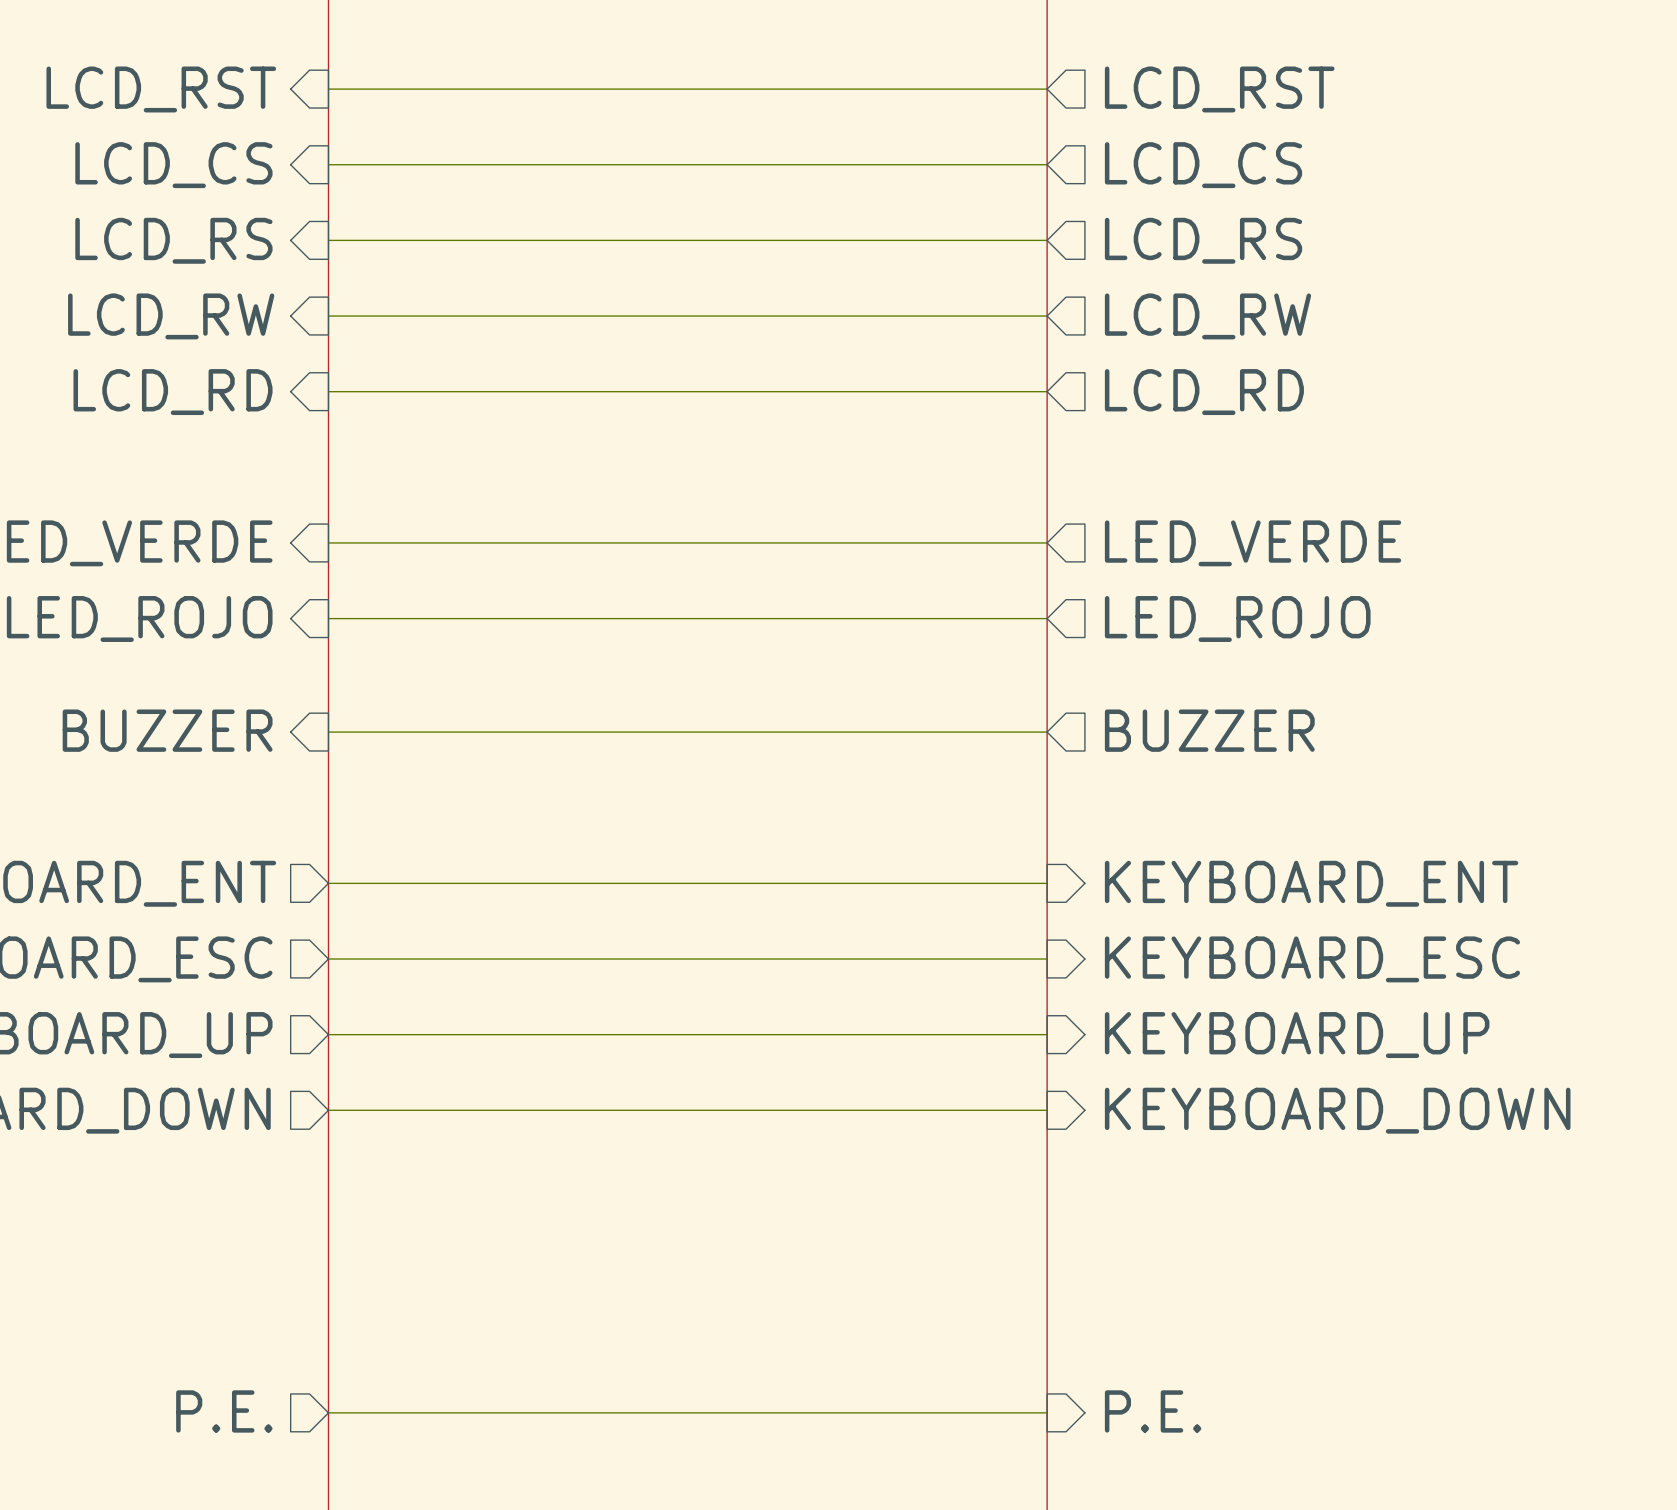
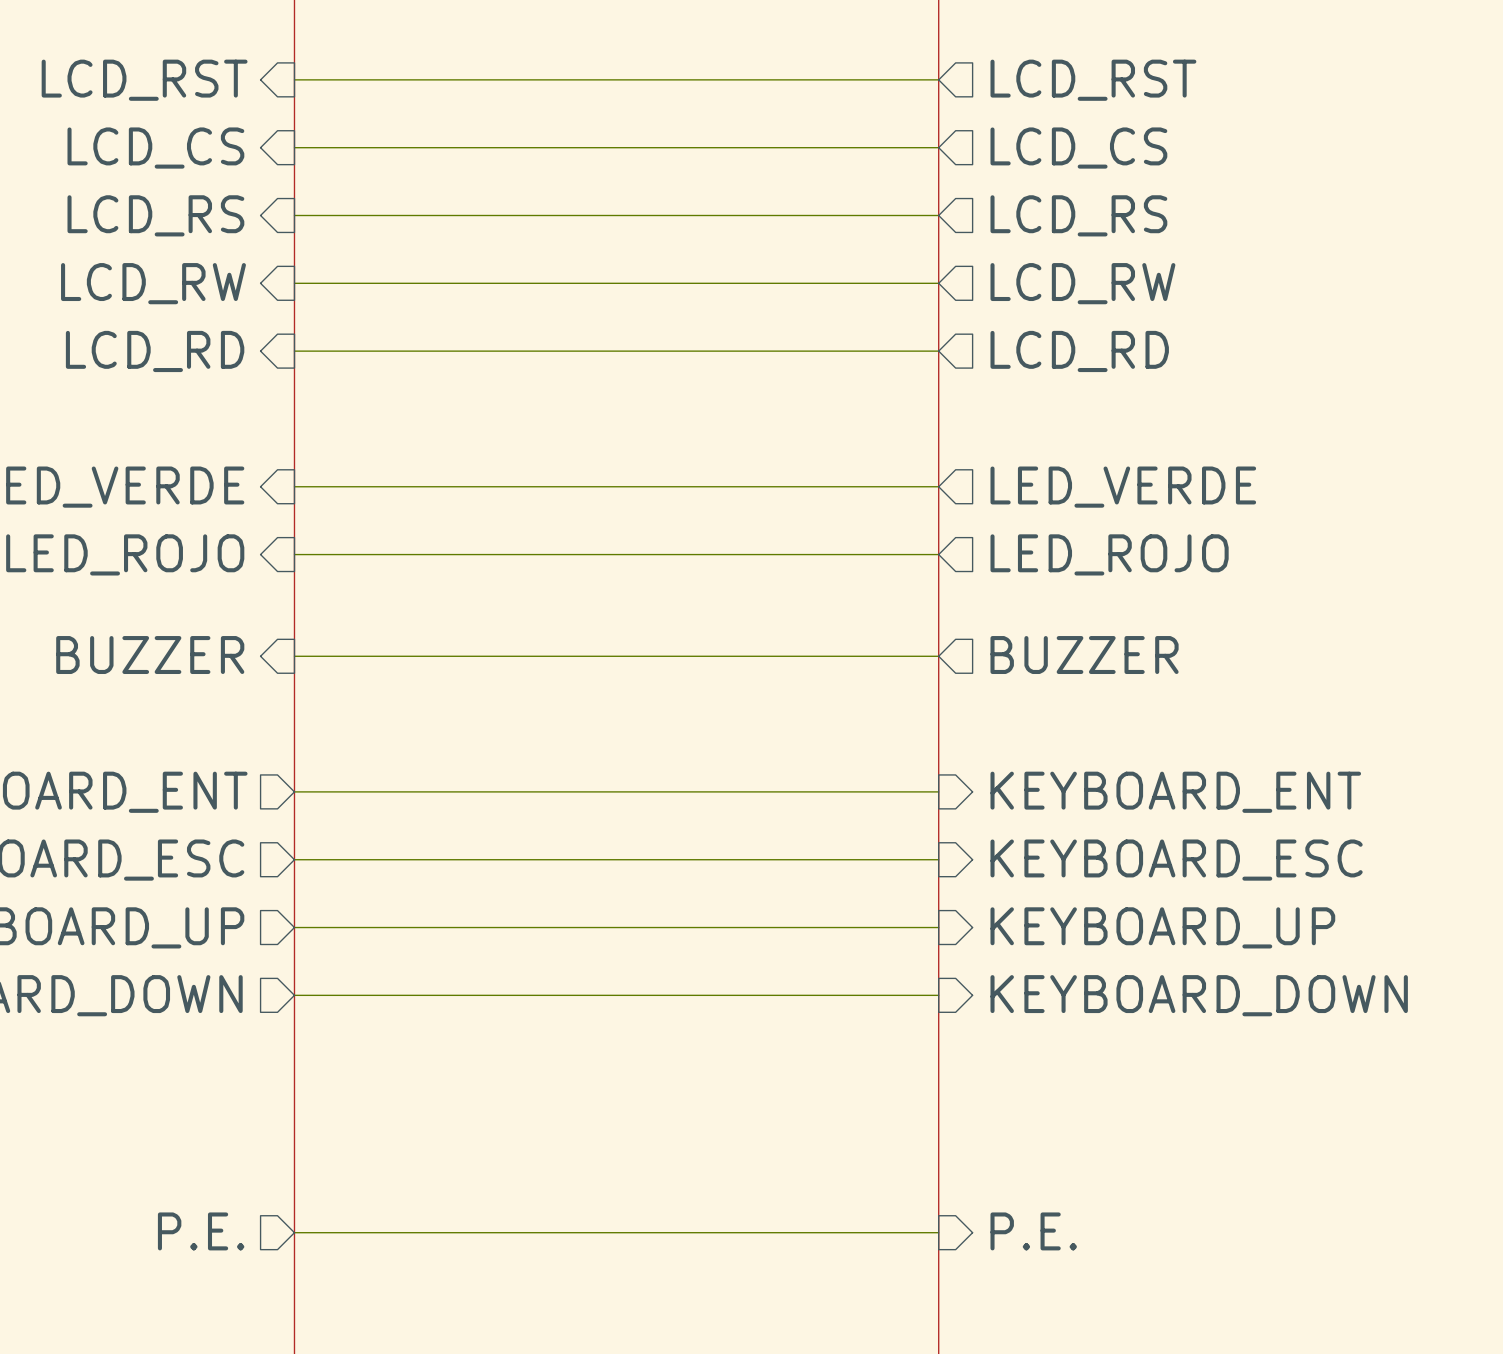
sheet pin position: P.E. (224, 1411) -> P.E. (201, 1231)
sheet pin position: P.E. (1153, 1411) -> P.E. (1033, 1231)
wire: (328, 1412) (1047, 1412) -> (294, 1232) (938, 1232)

